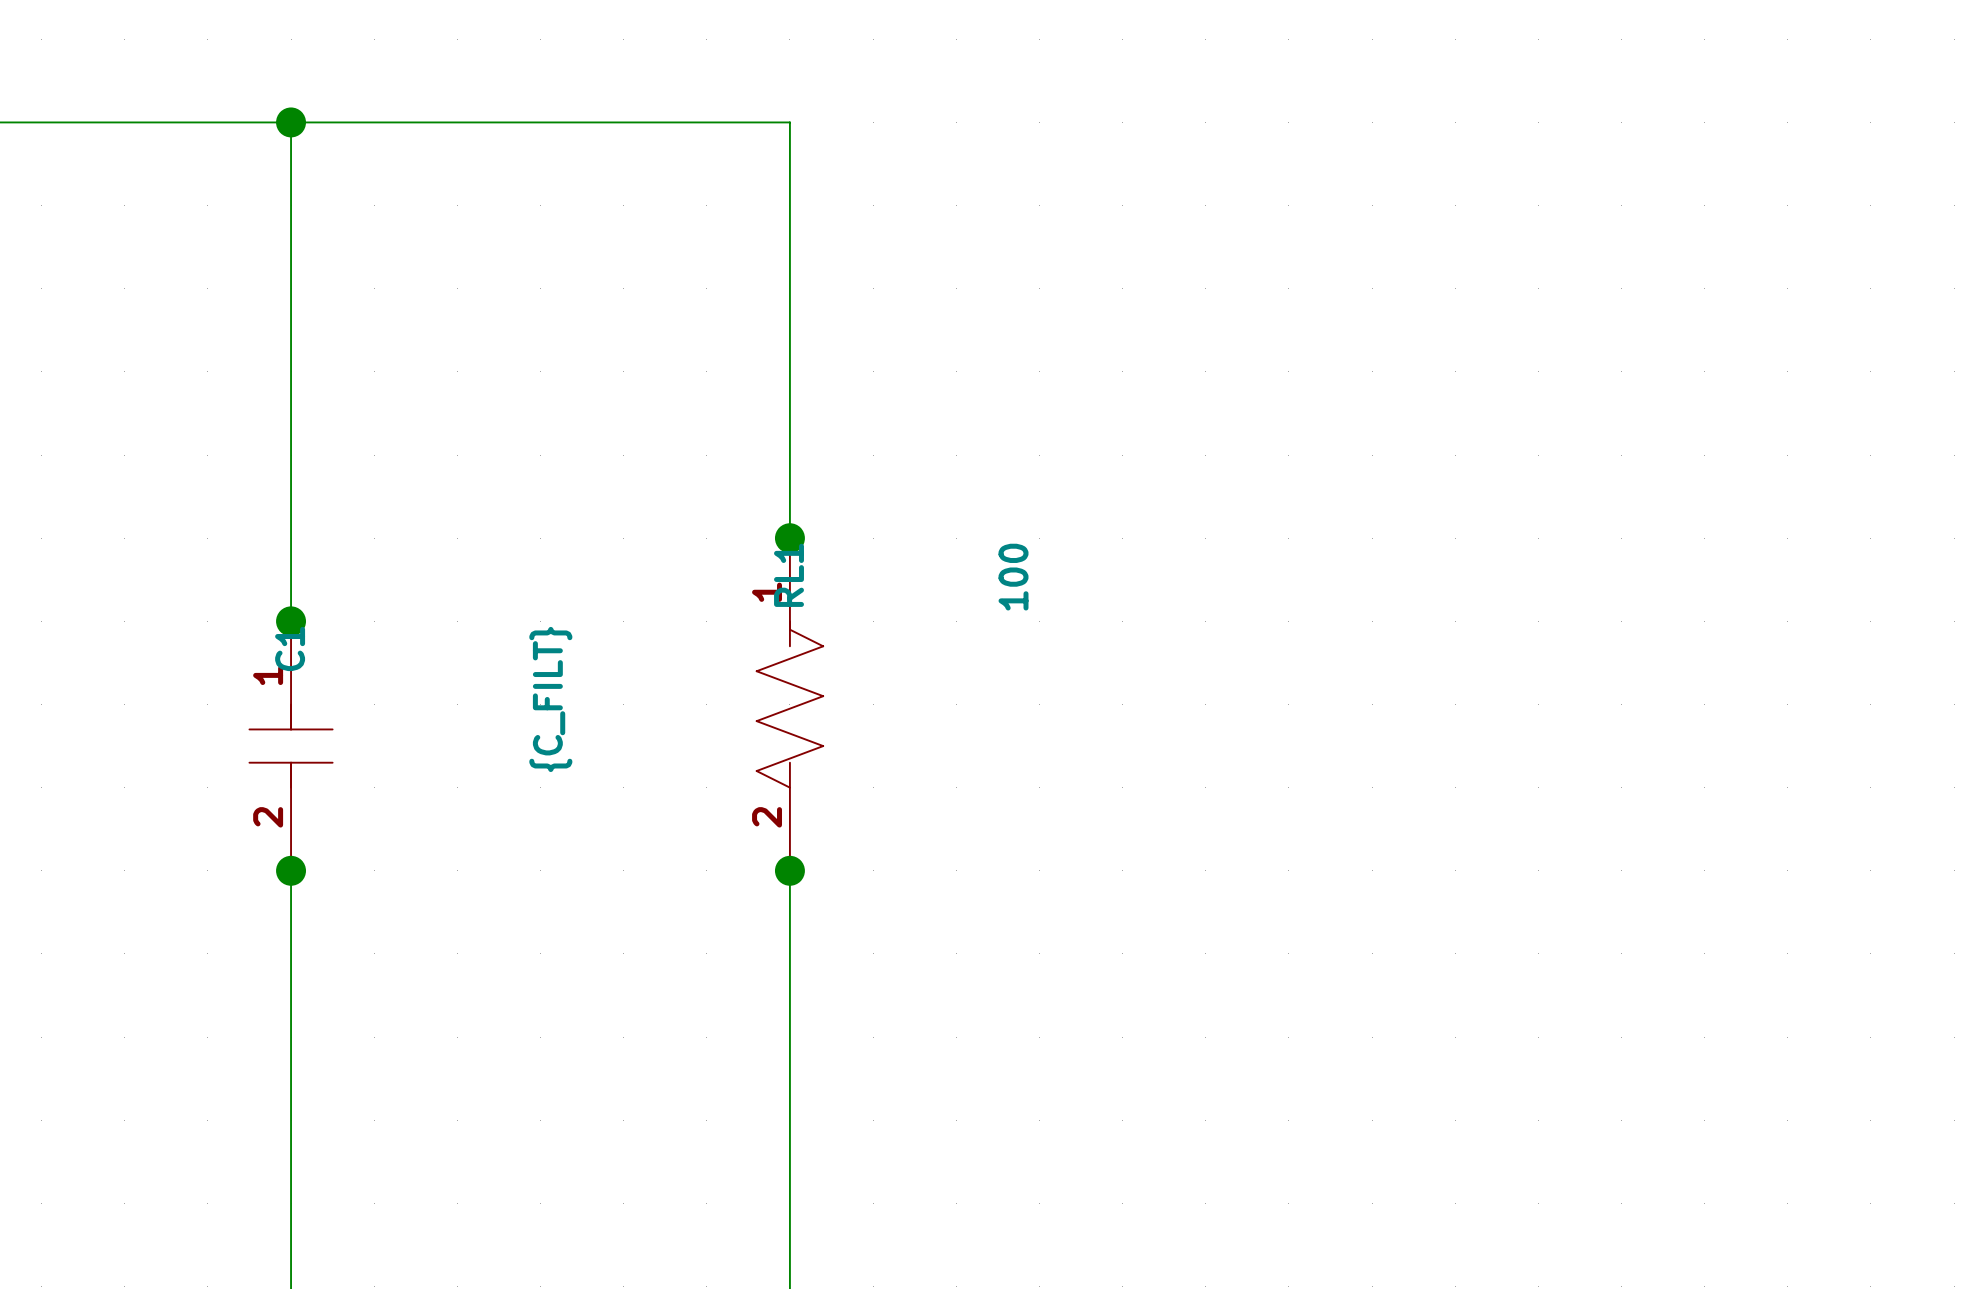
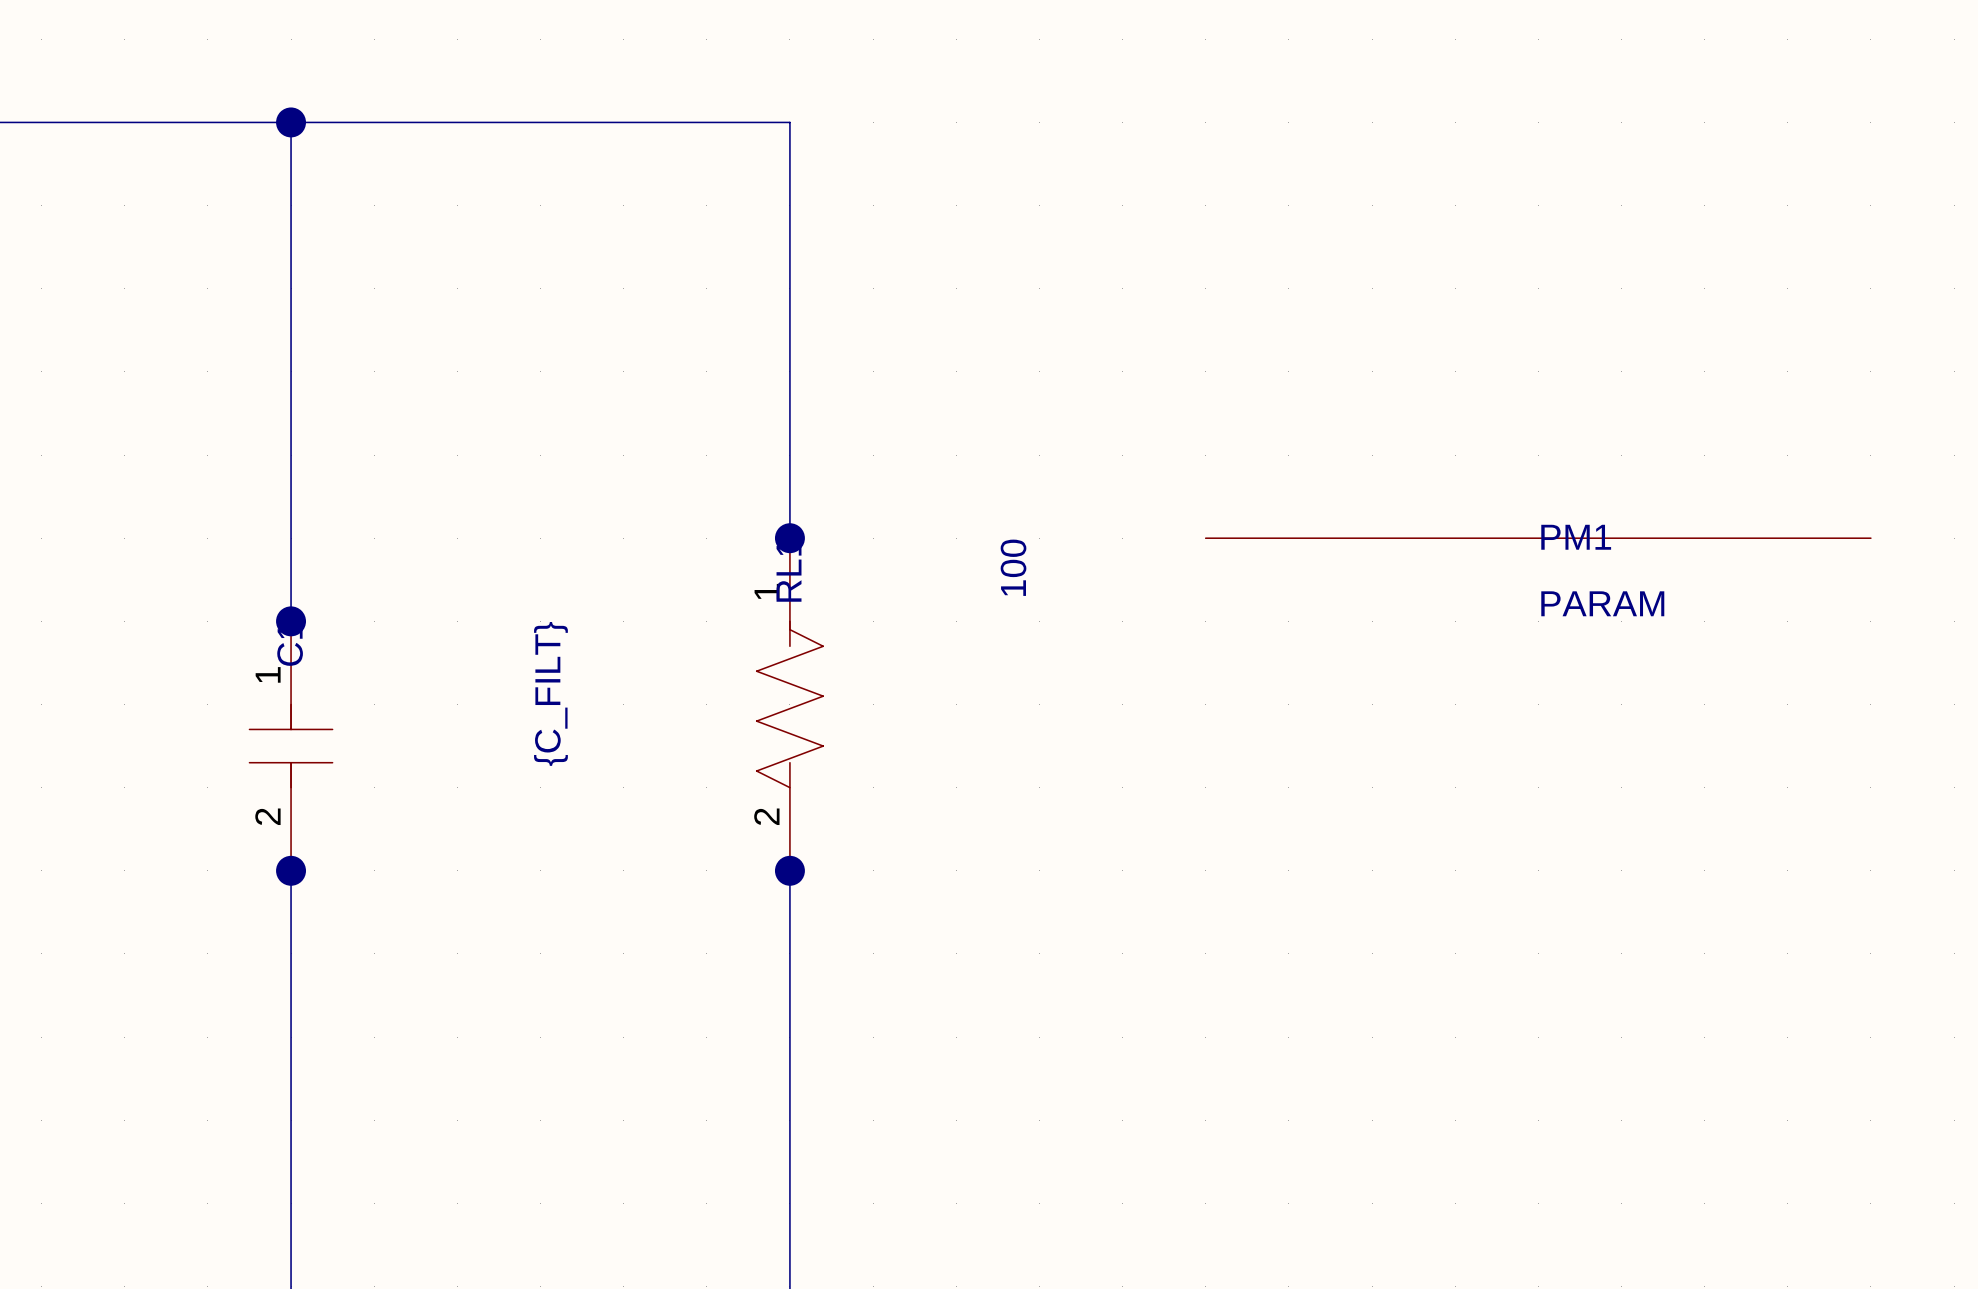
PM1: none -> PARAM (1538, 538)

